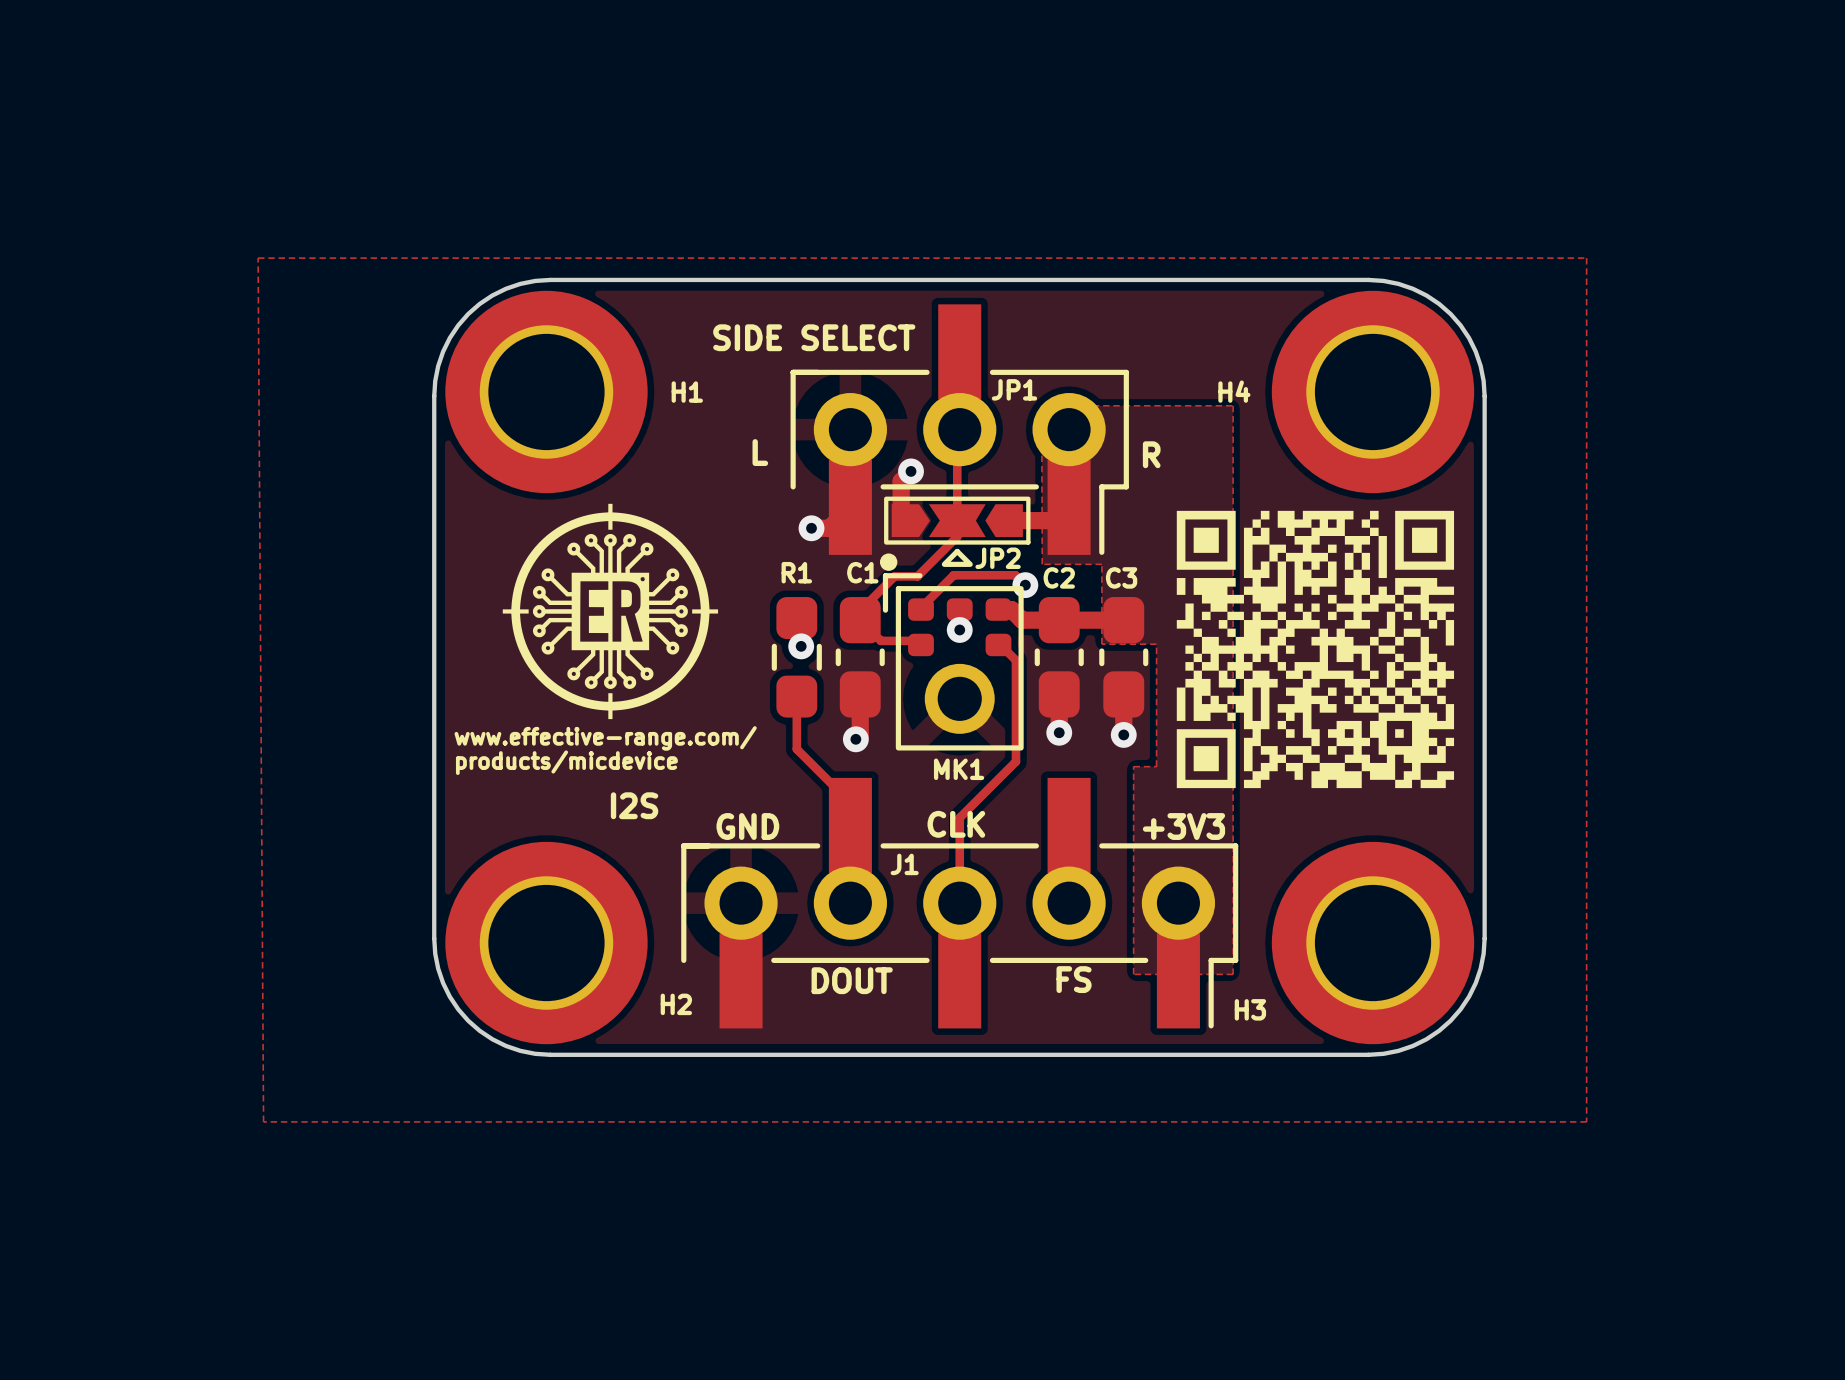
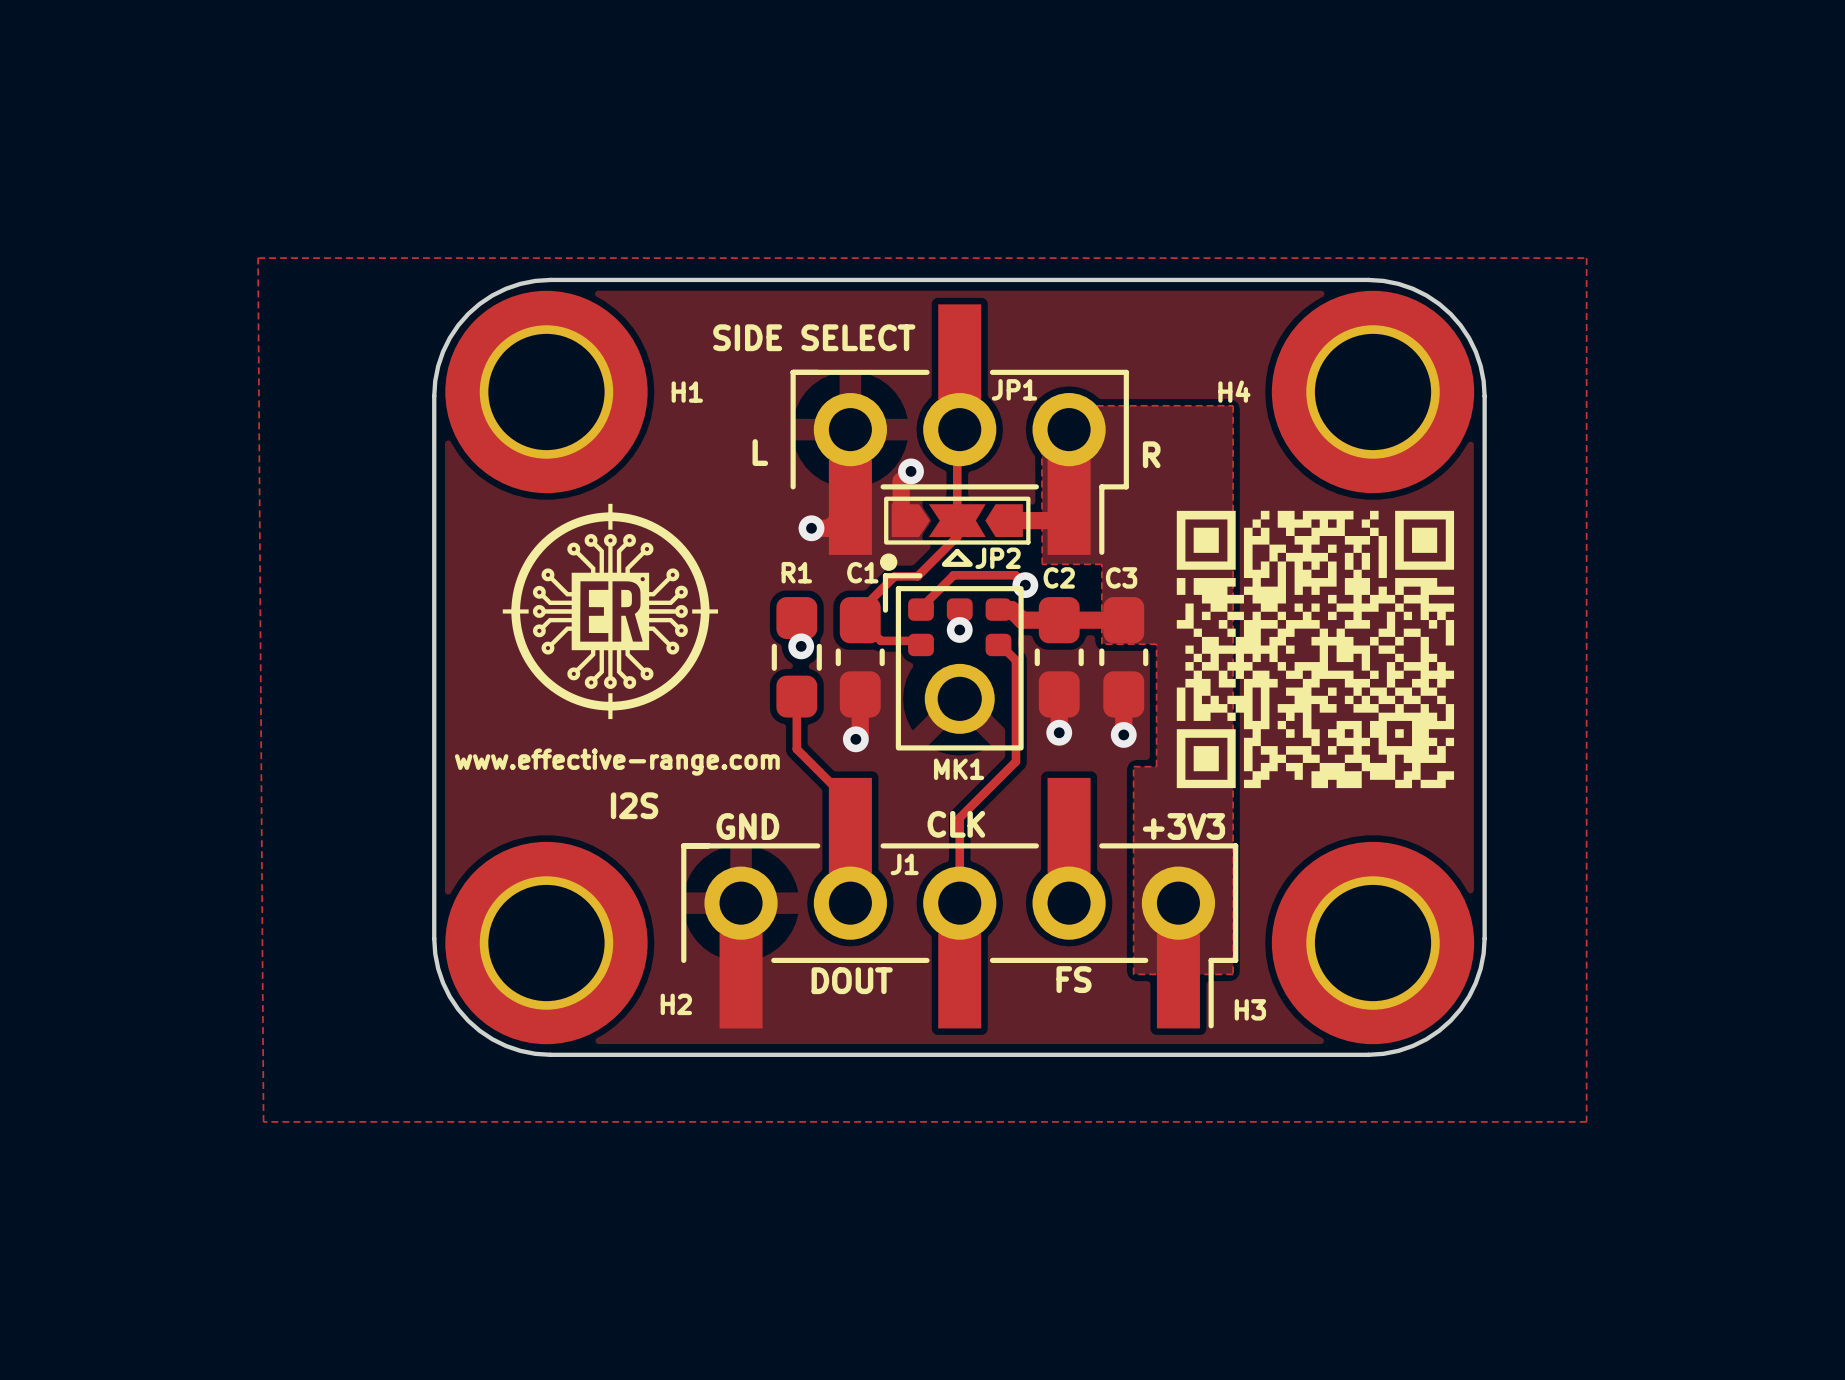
text: www.effective-range.com/ (605, 738) -> none
text: products/micdevice (566, 762) -> www.effective-range.com (617, 762)

